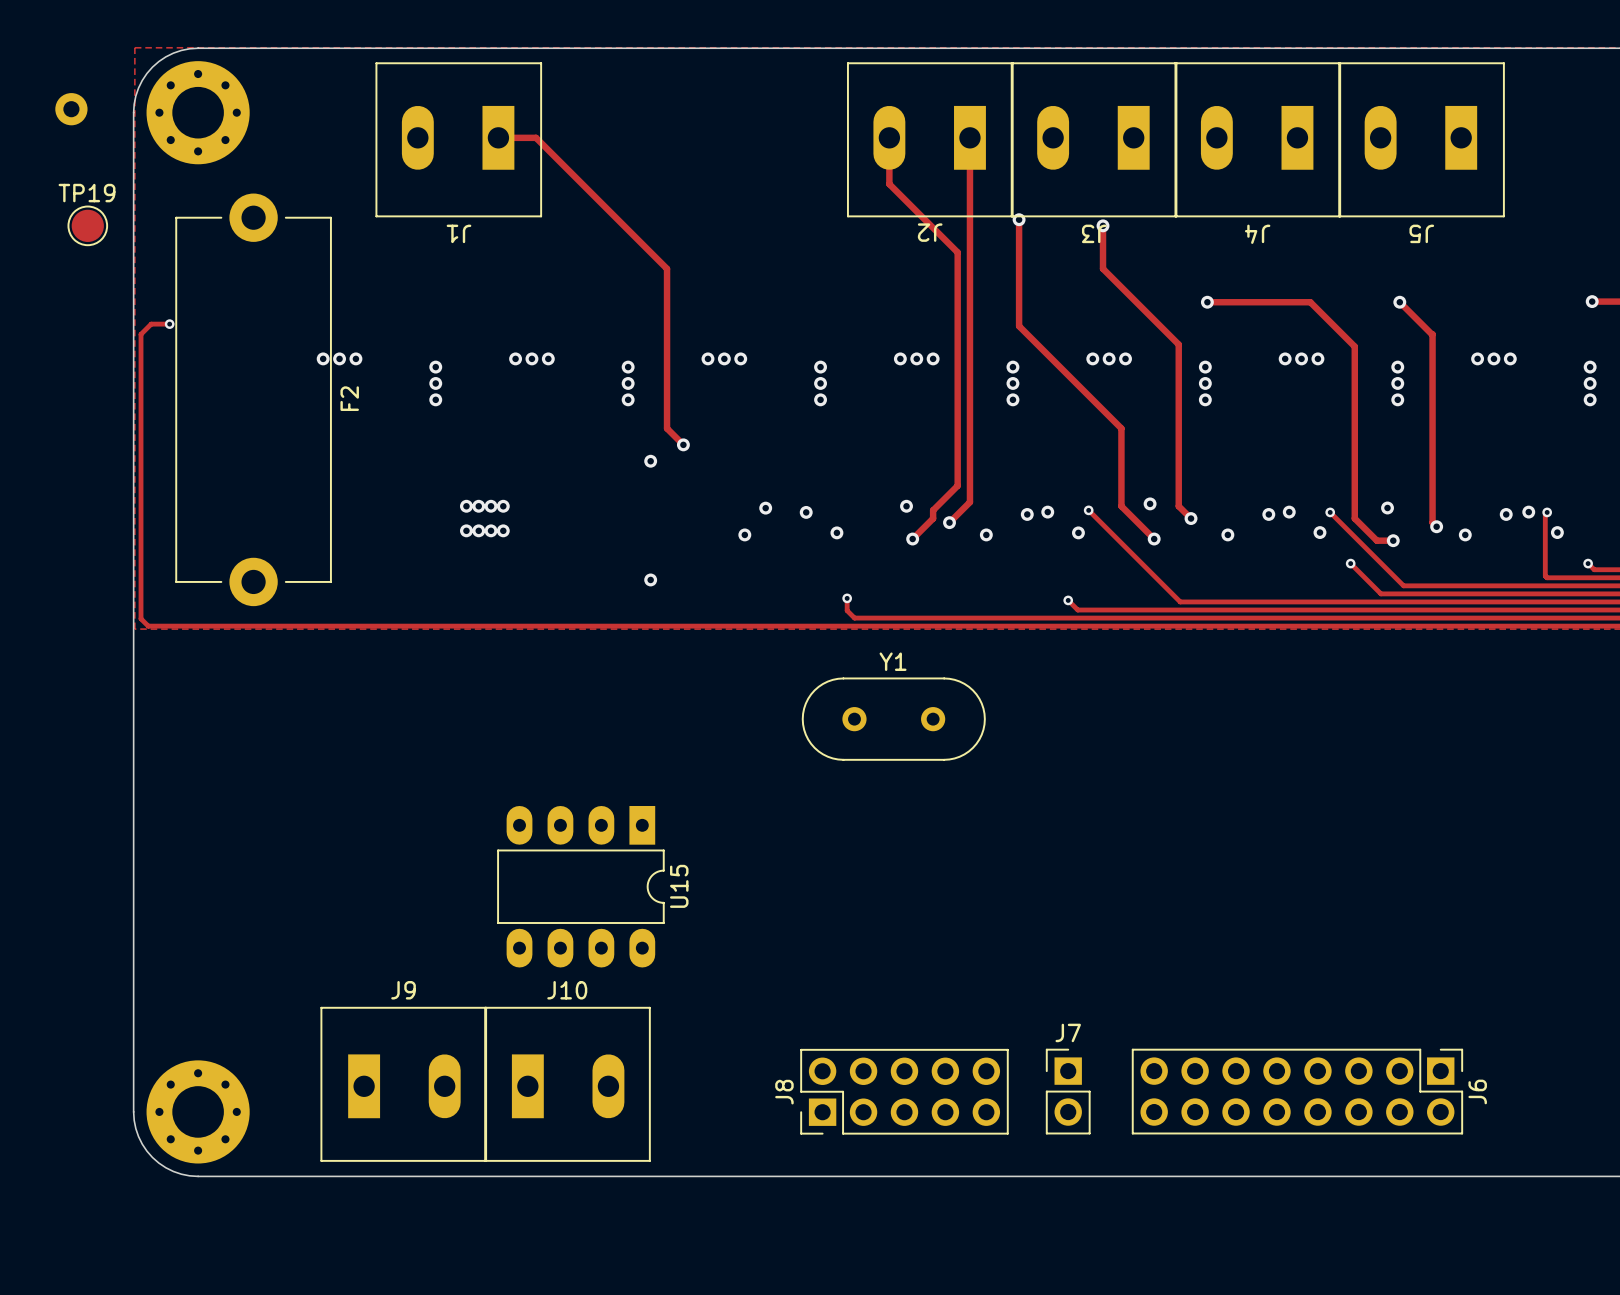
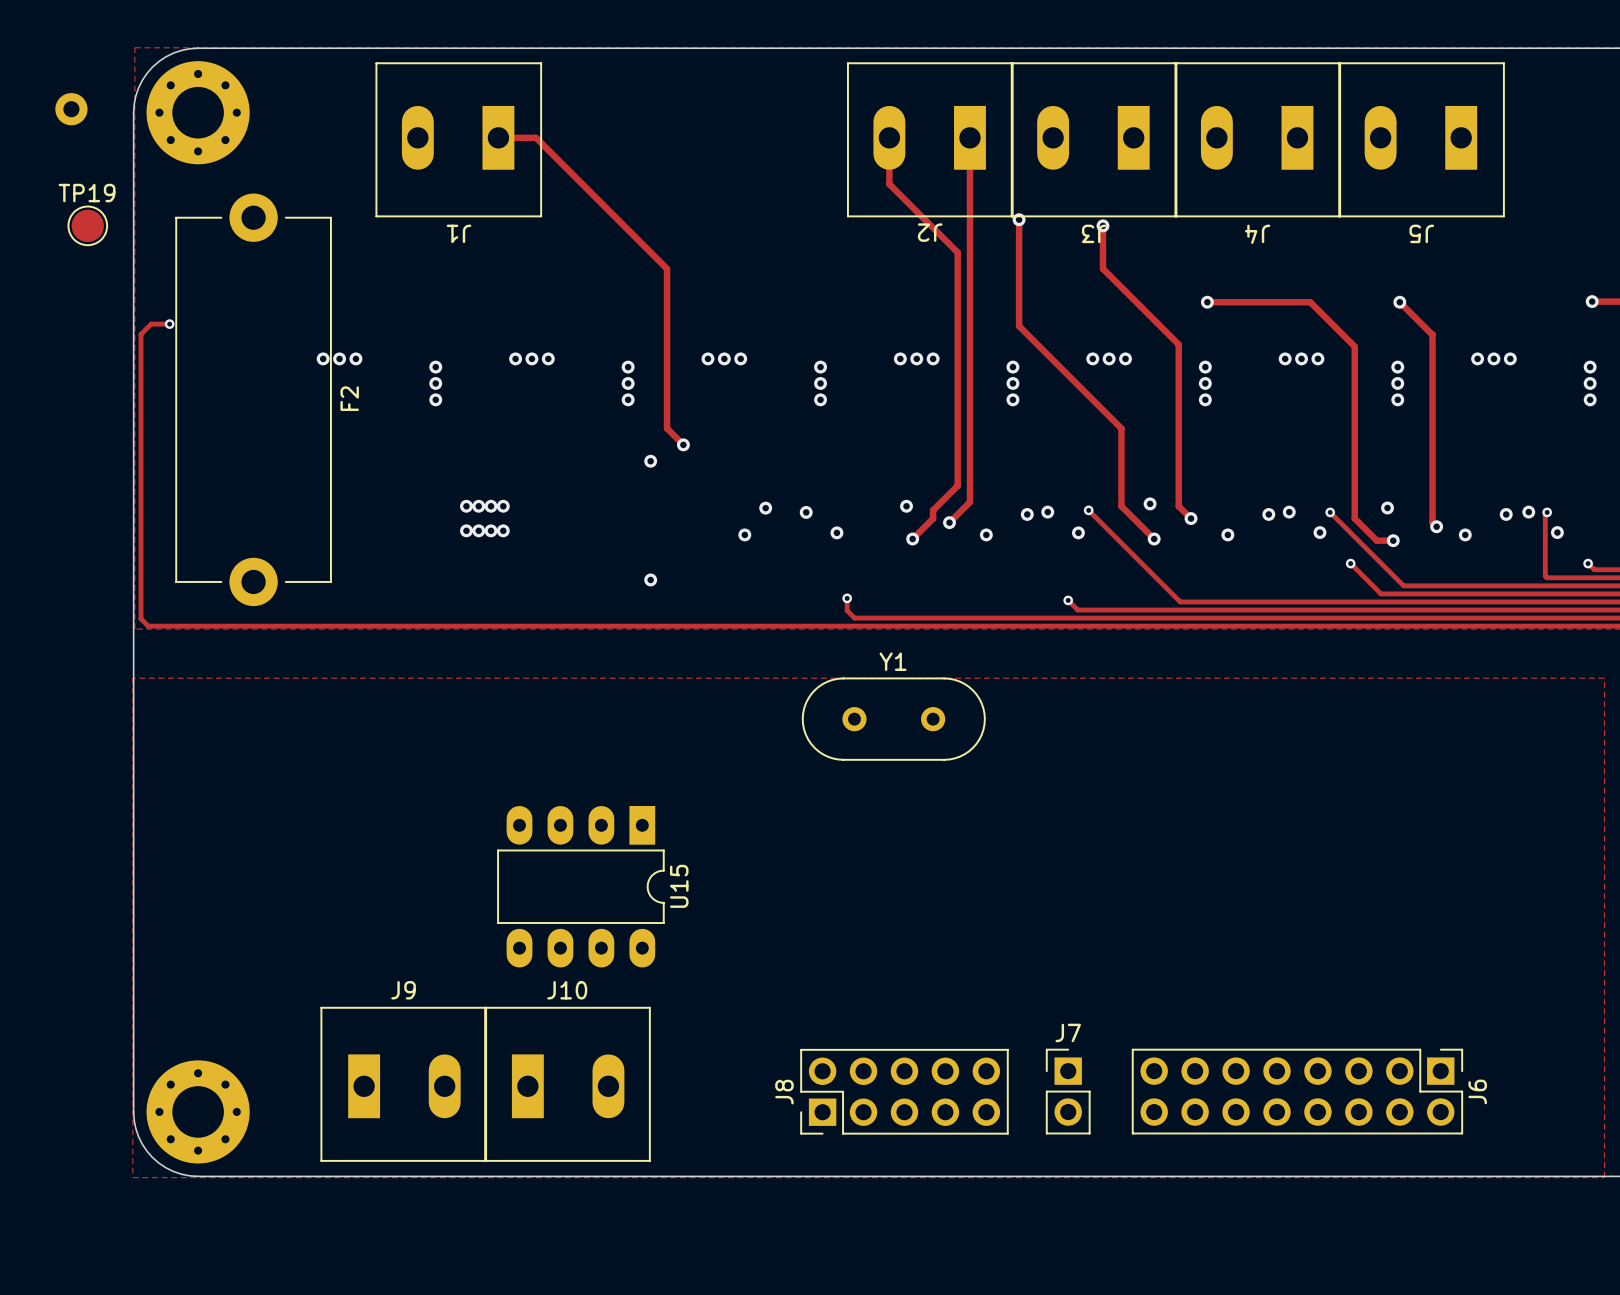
zone outline: none -> (132, 678) (1604, 678) (1604, 1177) (132, 1177) (132, 678)

